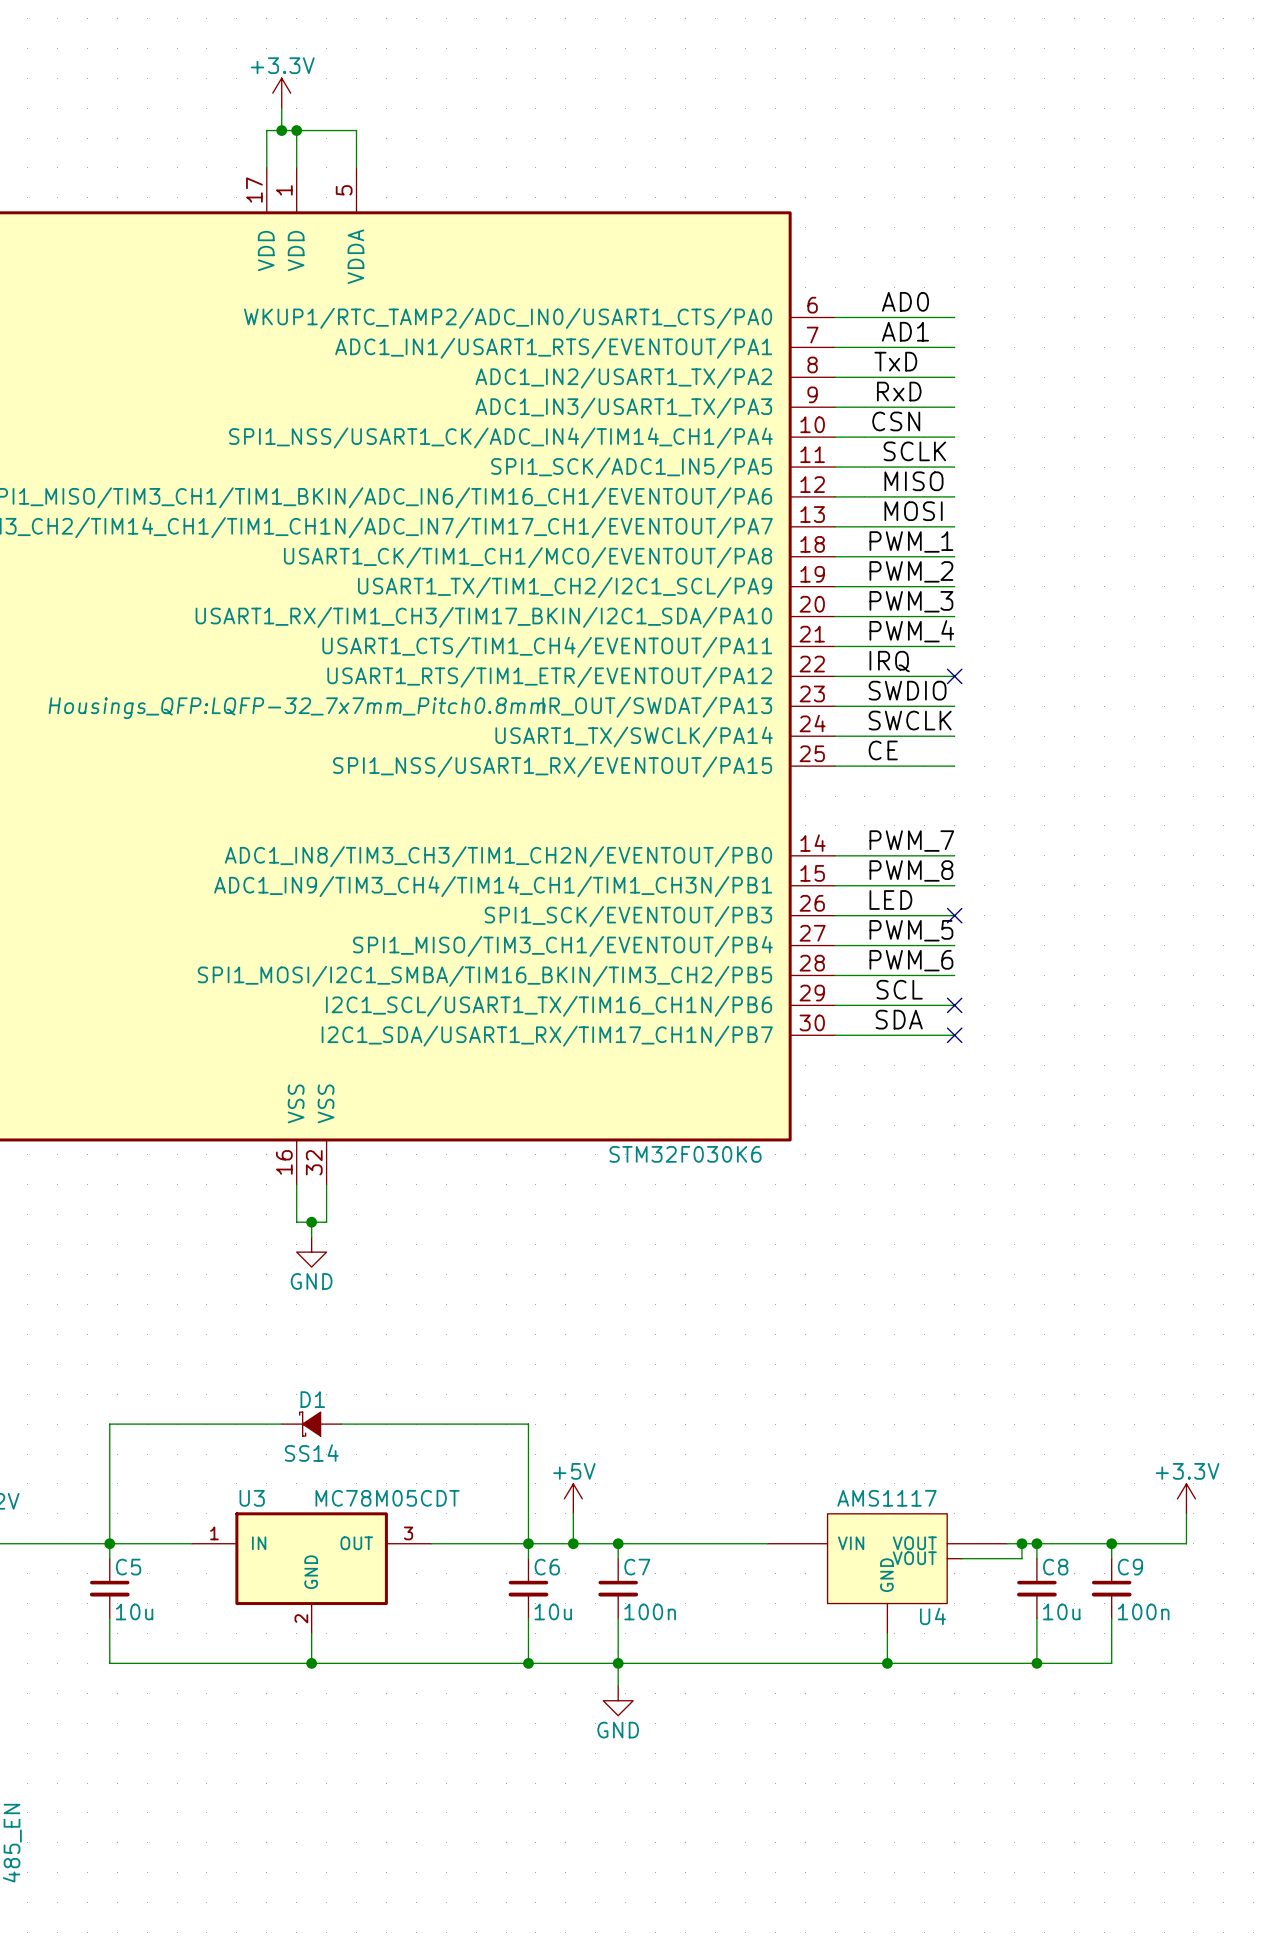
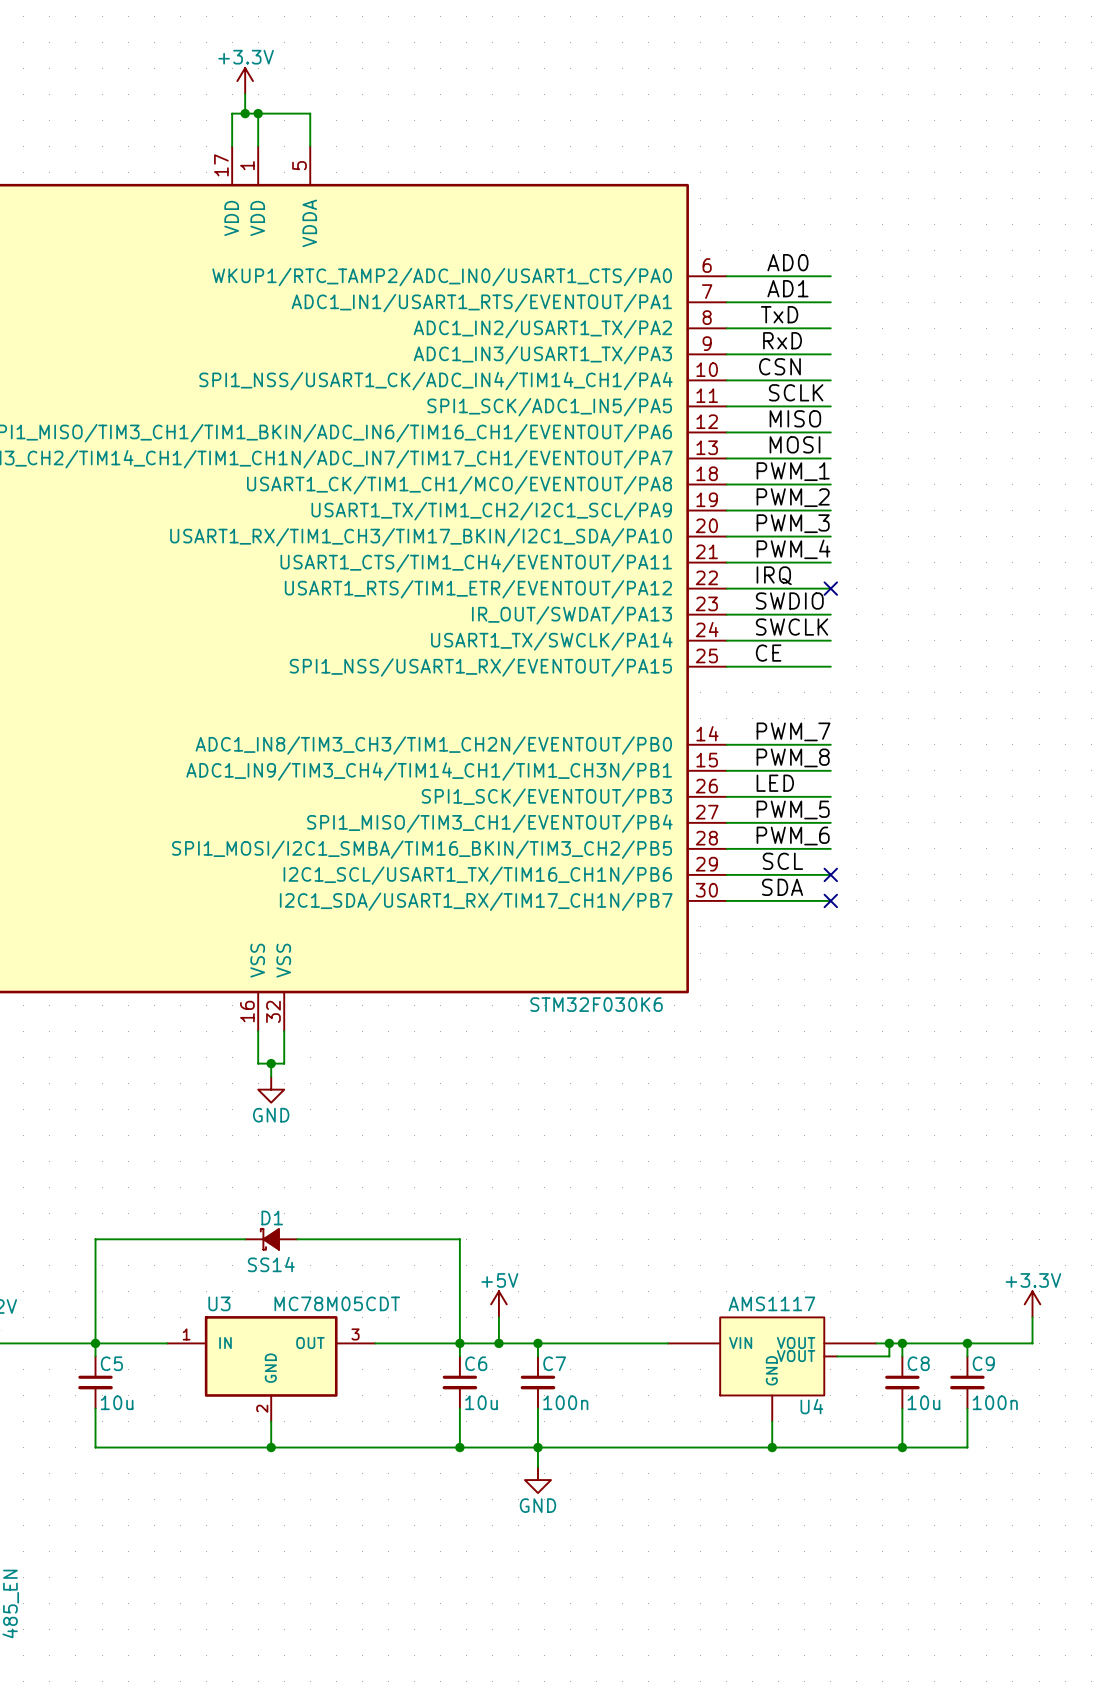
part text: Housings_QFP:LQFP-32_7x7mm_Pitch0.8mm (297, 708) -> none
no-connect mark: (954, 915) -> none

